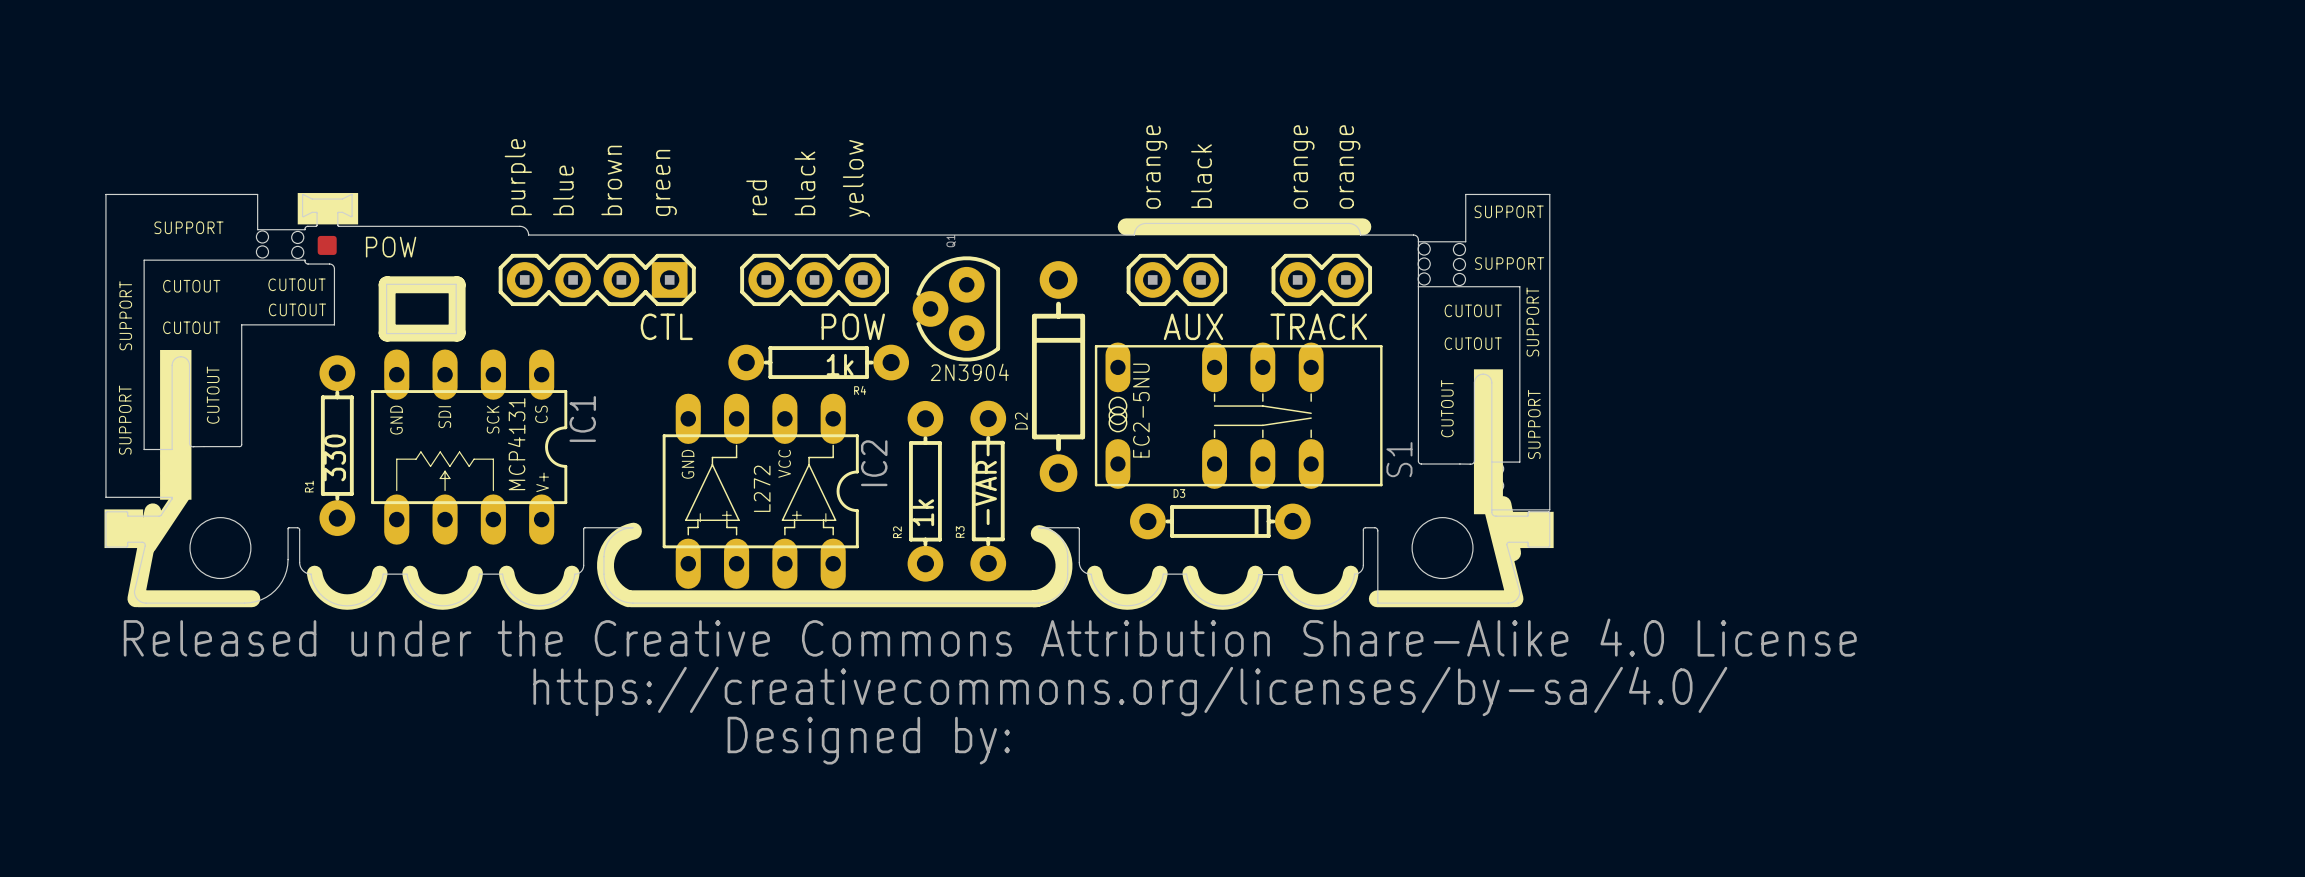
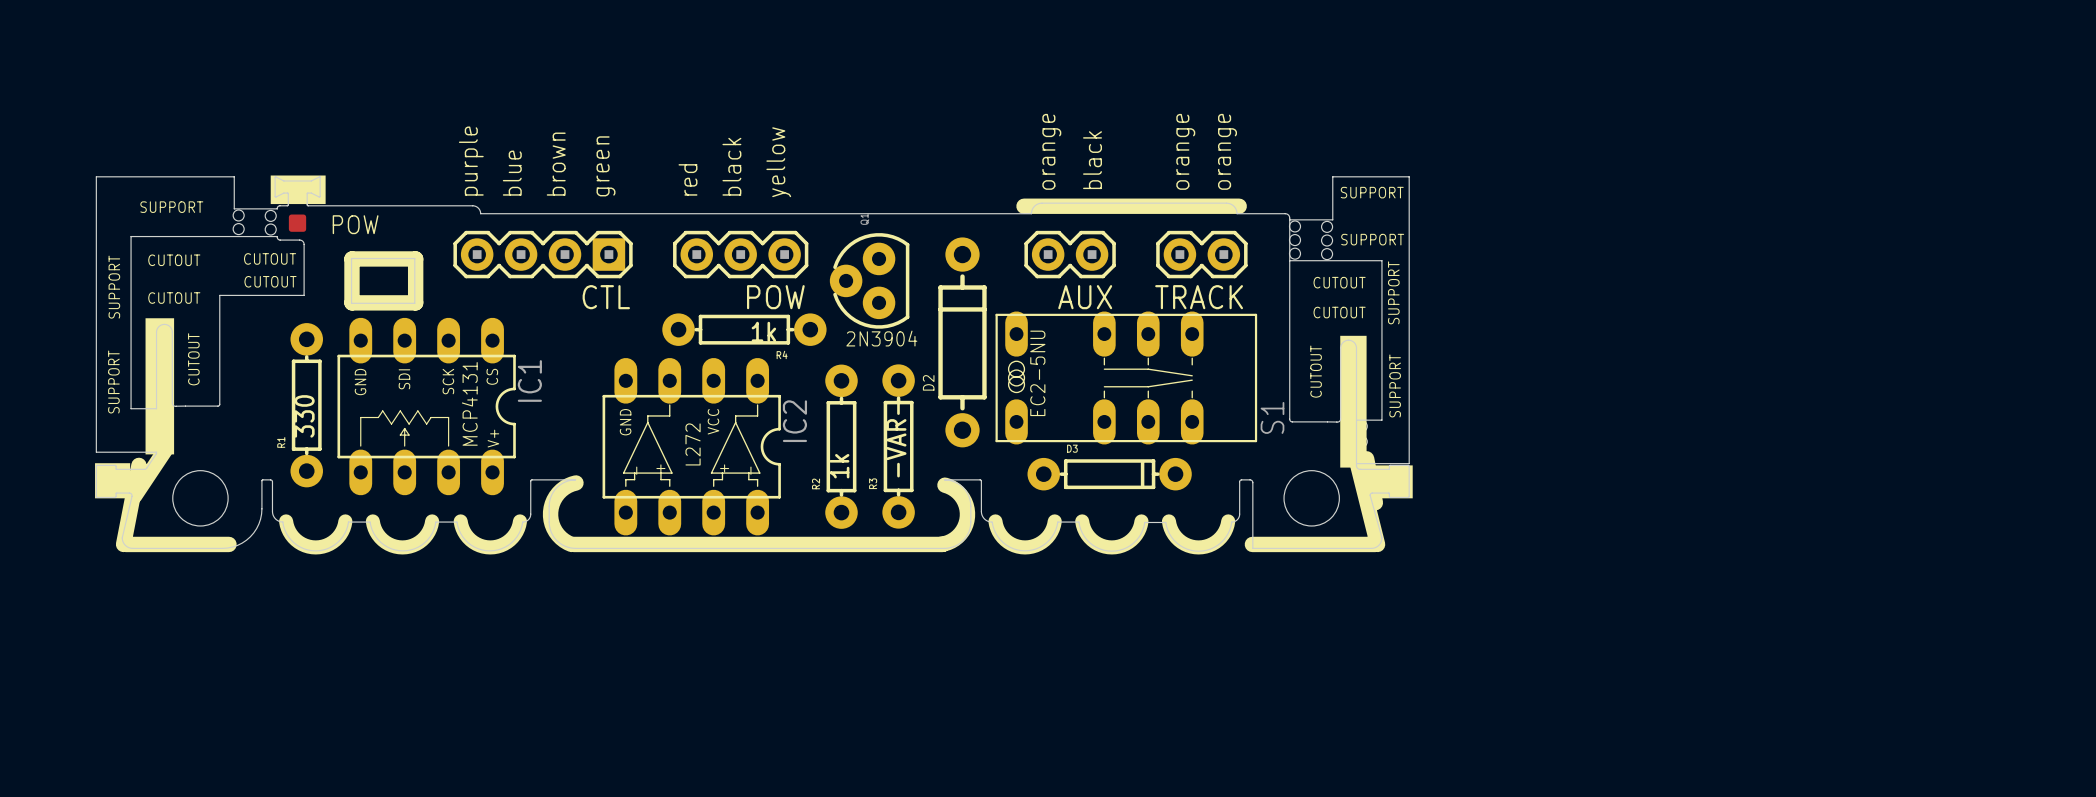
drawing: [123, 618, 1857, 765] -> none

